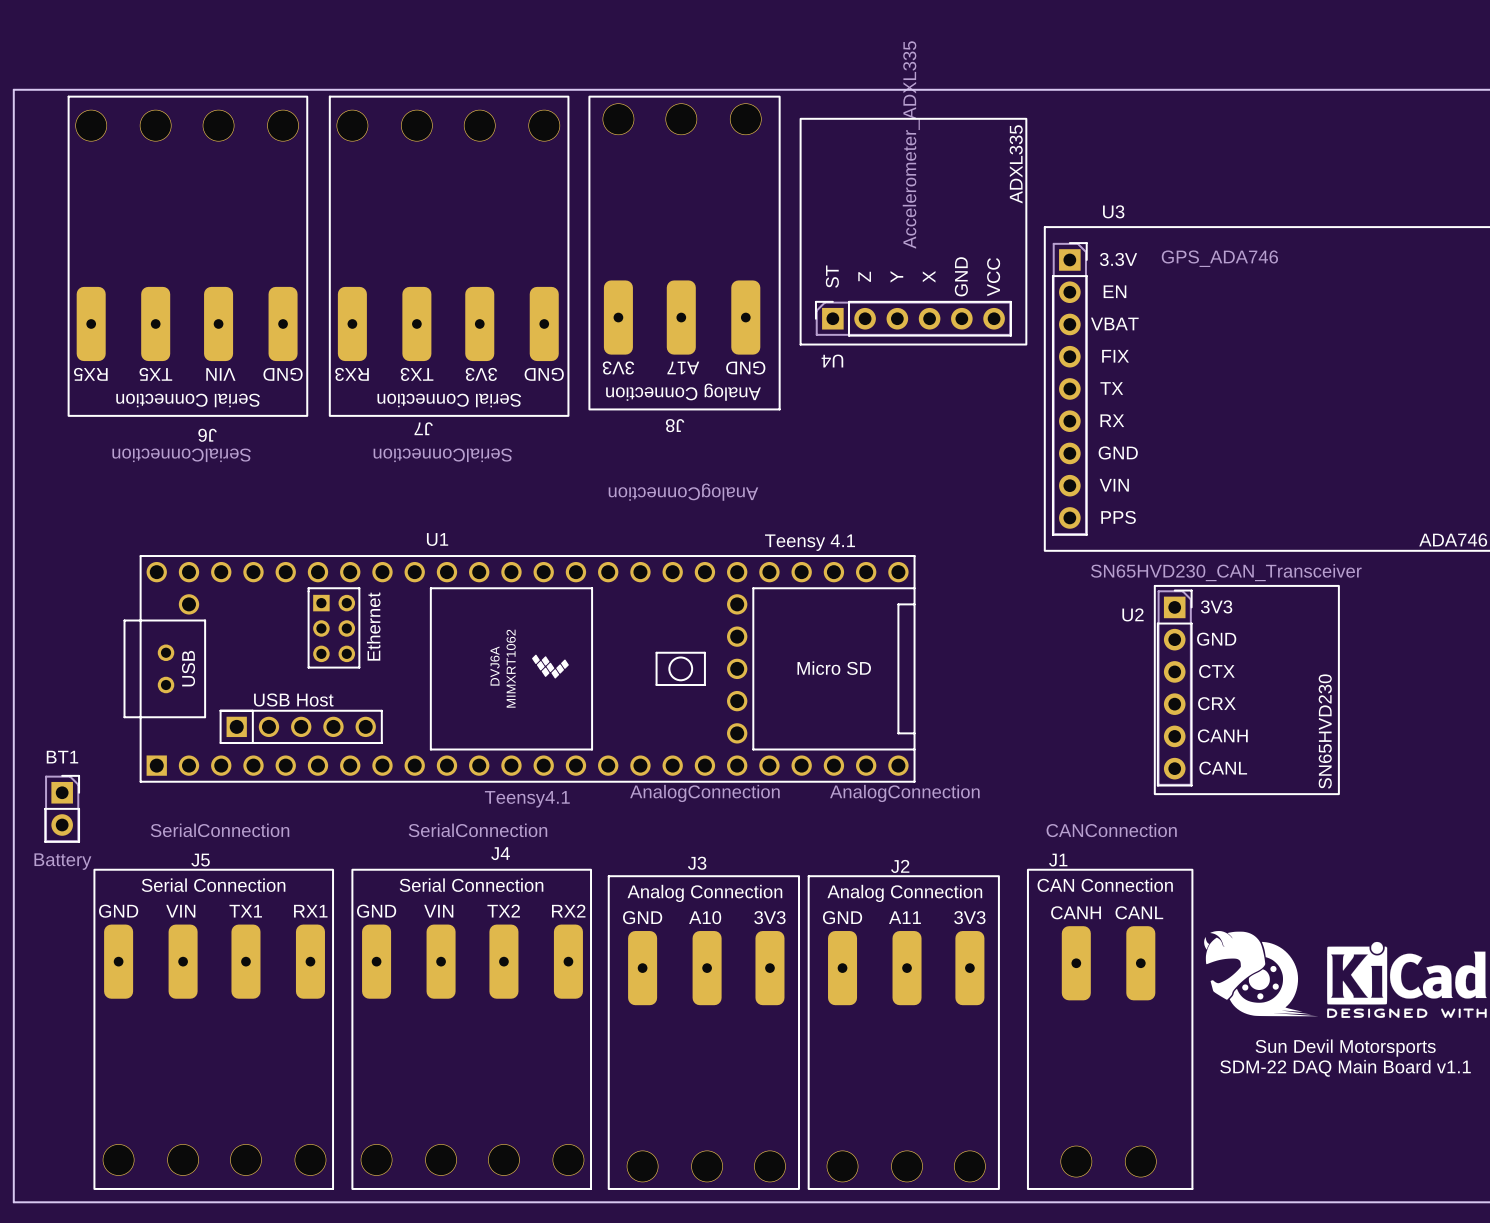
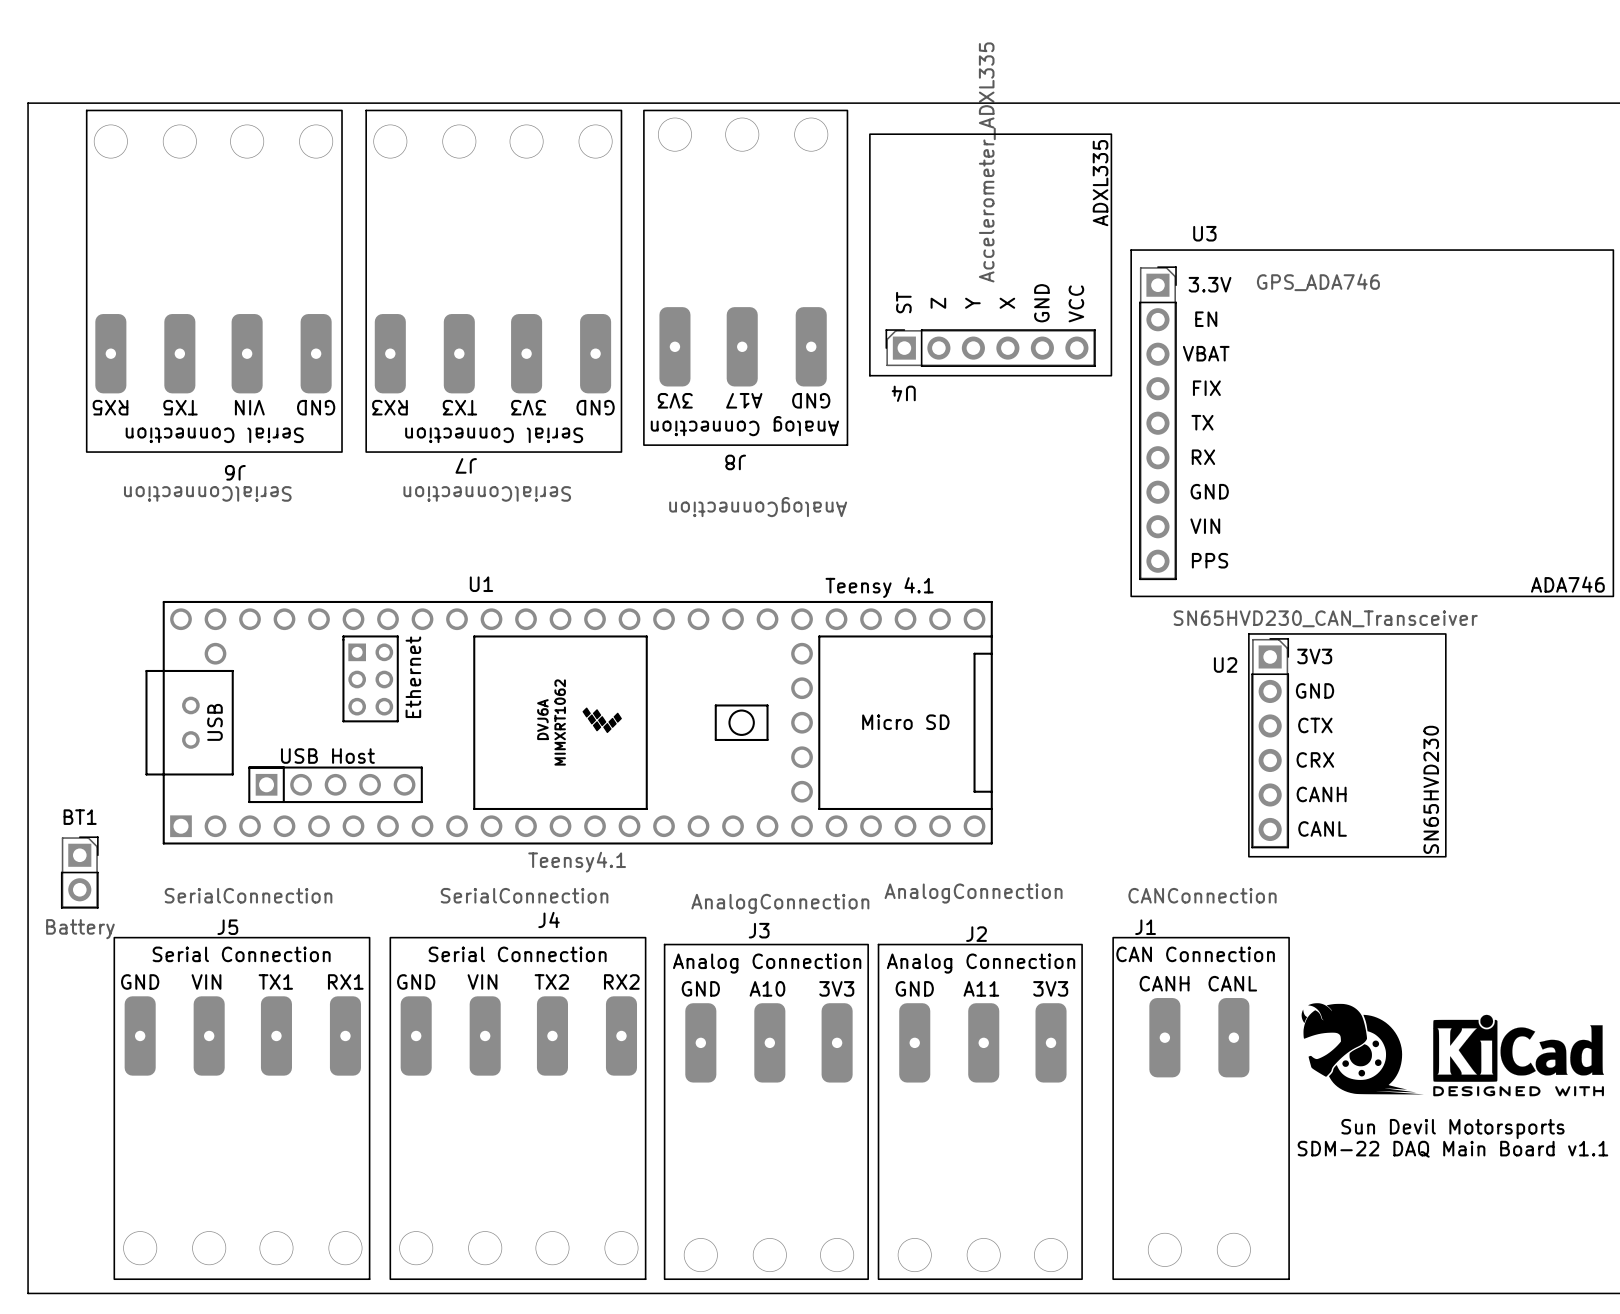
J8 value position: AnalogConnection (683, 492) -> AnalogConnection (758, 507)
J3 value position: AnalogConnection (704, 793) -> AnalogConnection (780, 903)
J2 value position: AnalogConnection (904, 793) -> AnalogConnection (973, 893)

